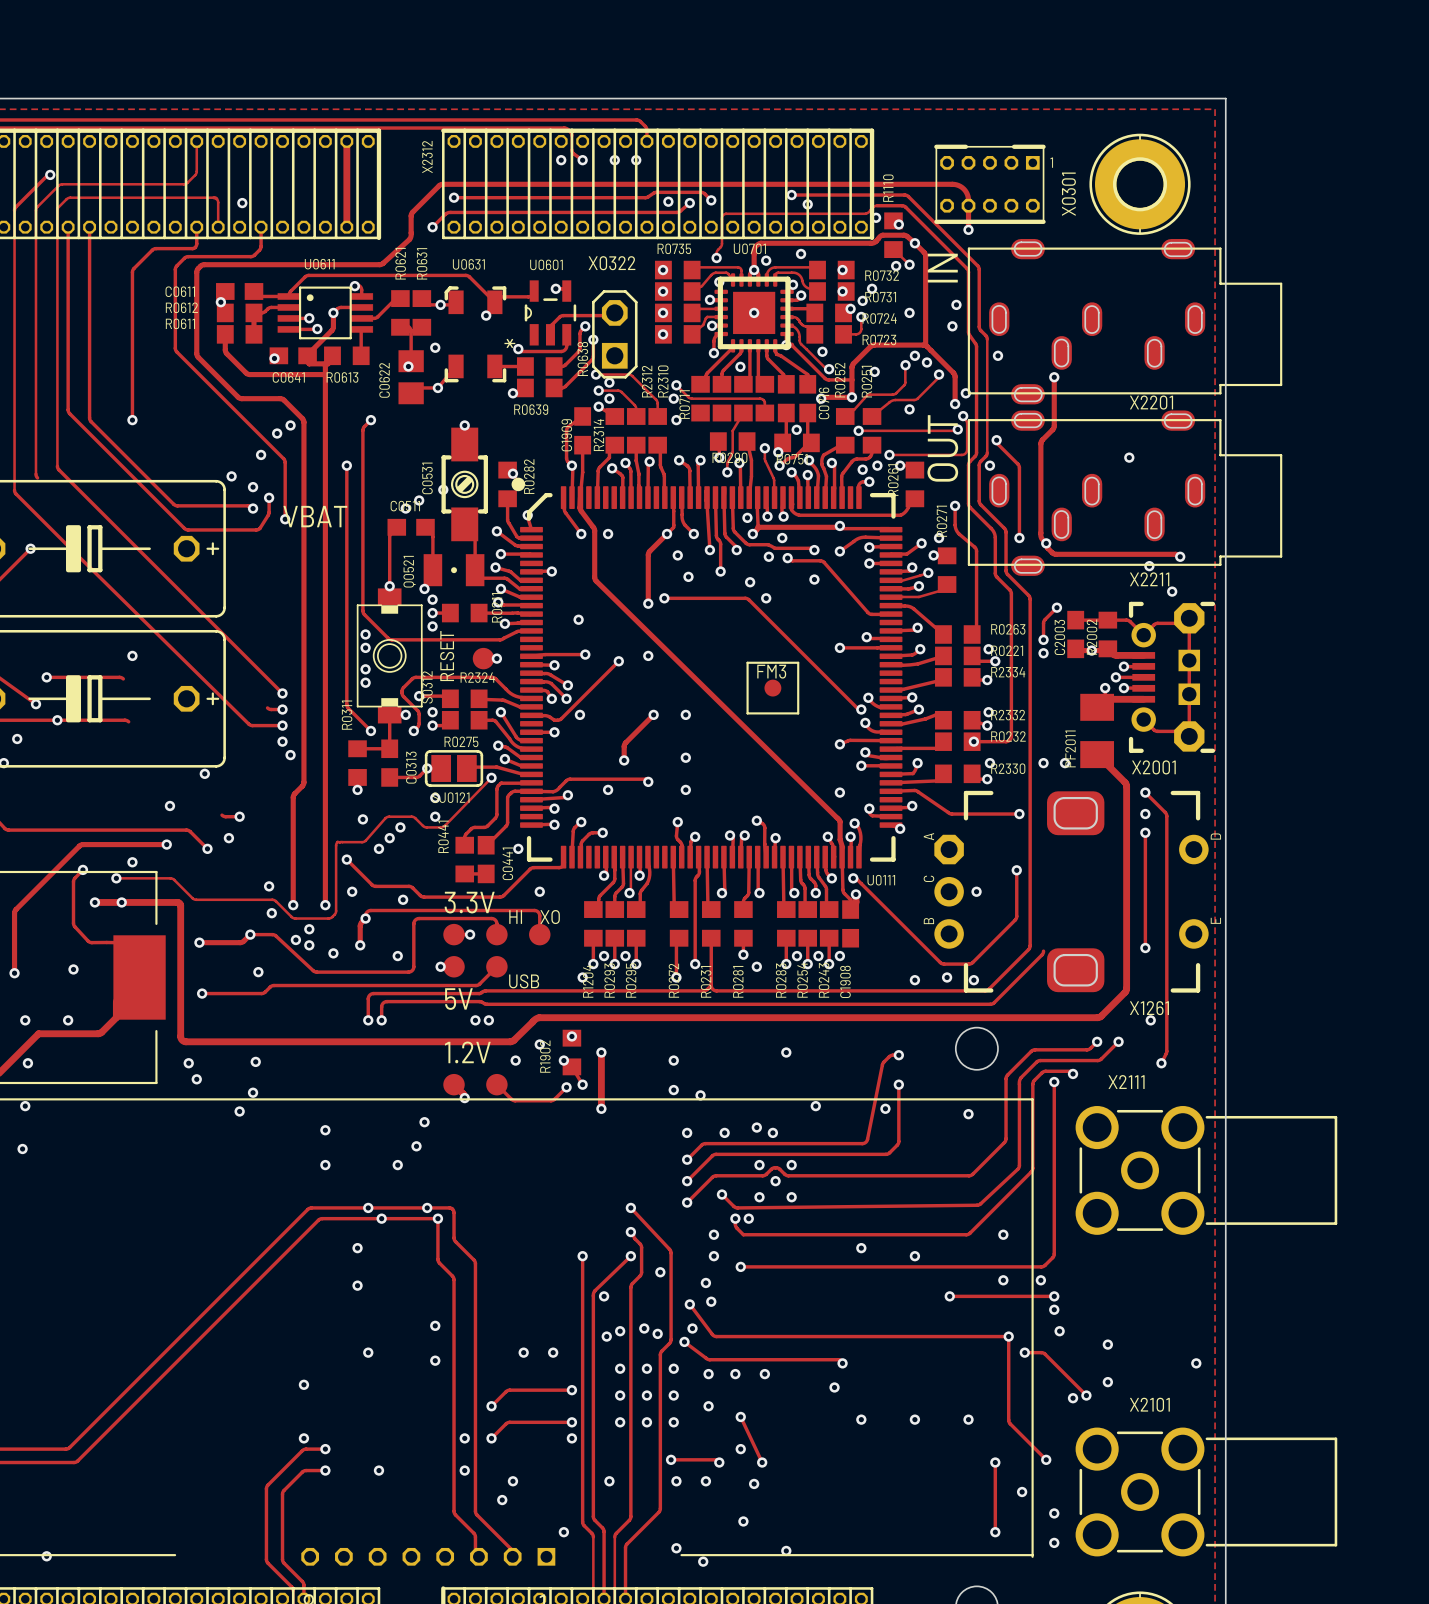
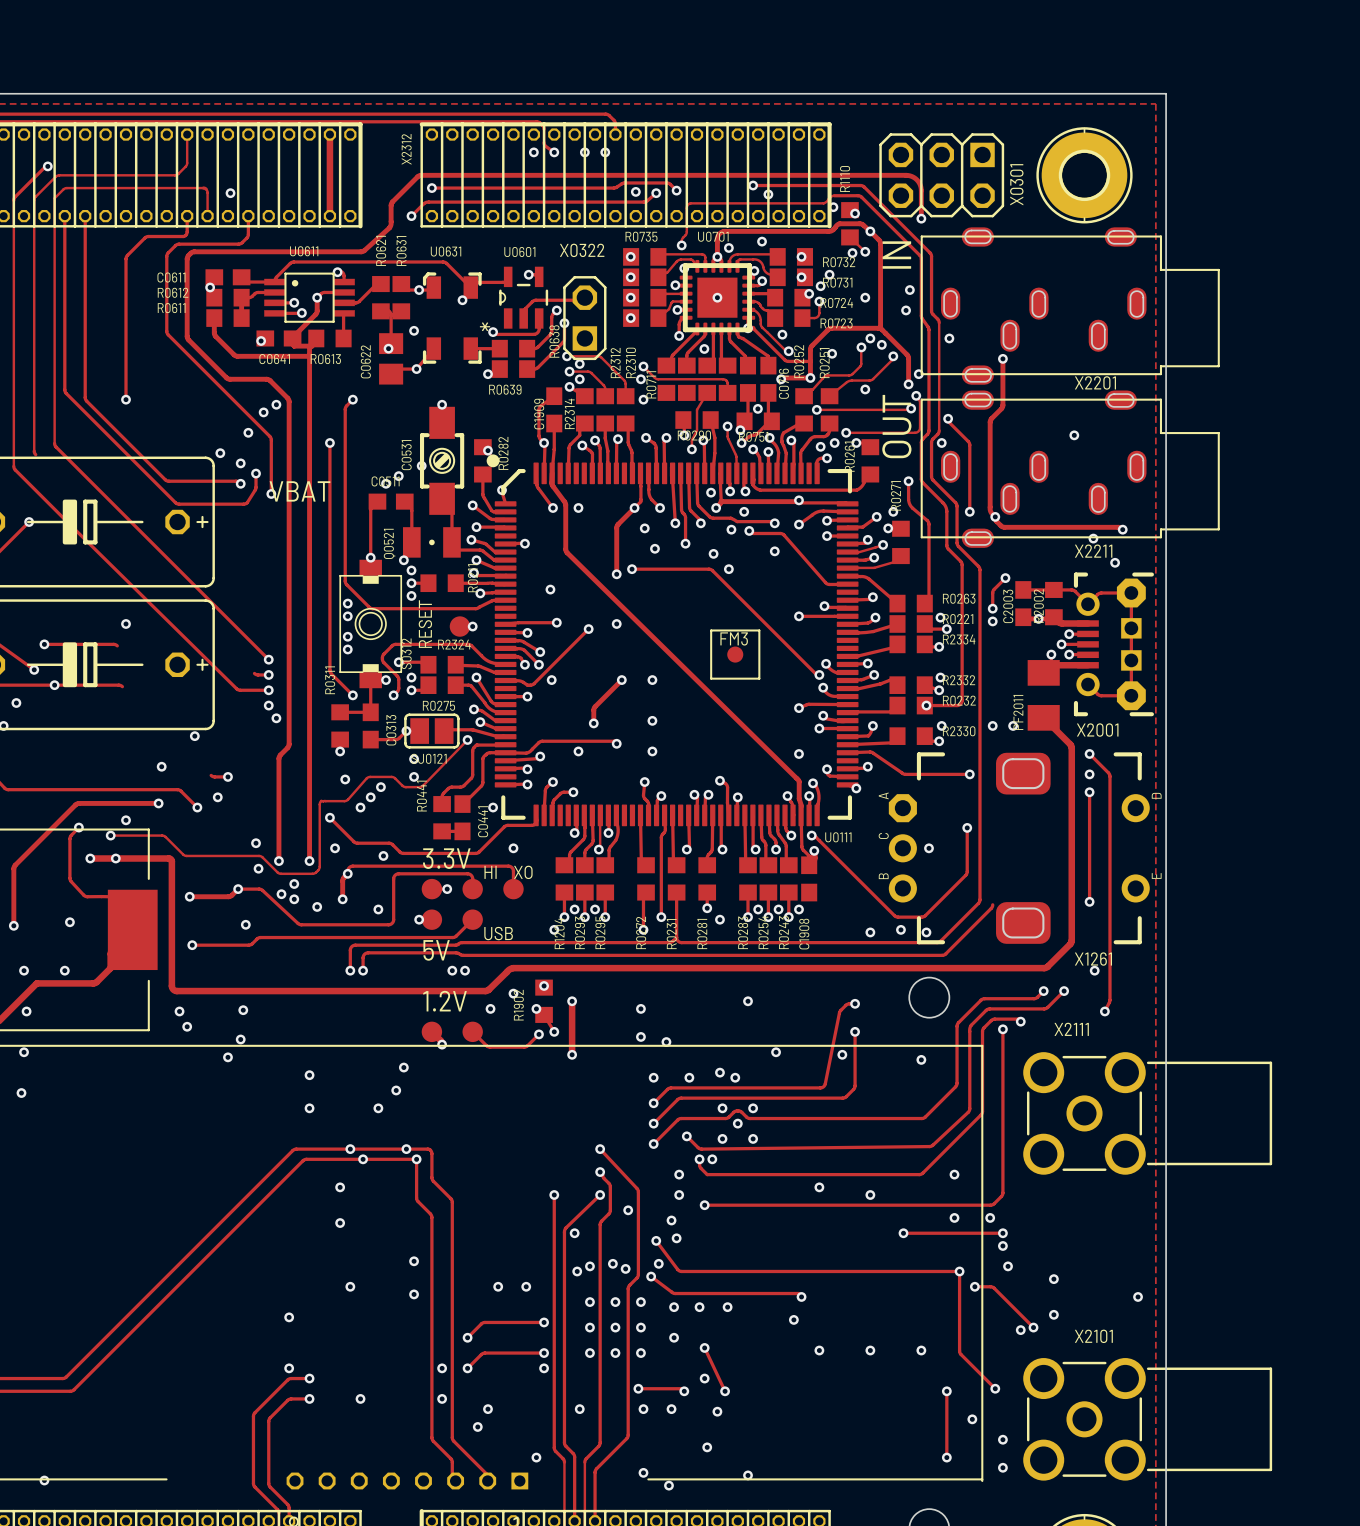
X0301 footprint: [934, 144, 1046, 224] -> [879, 133, 1005, 218]
X2001 footprint: [1128, 601, 1216, 753] -> [1073, 572, 1154, 717]

